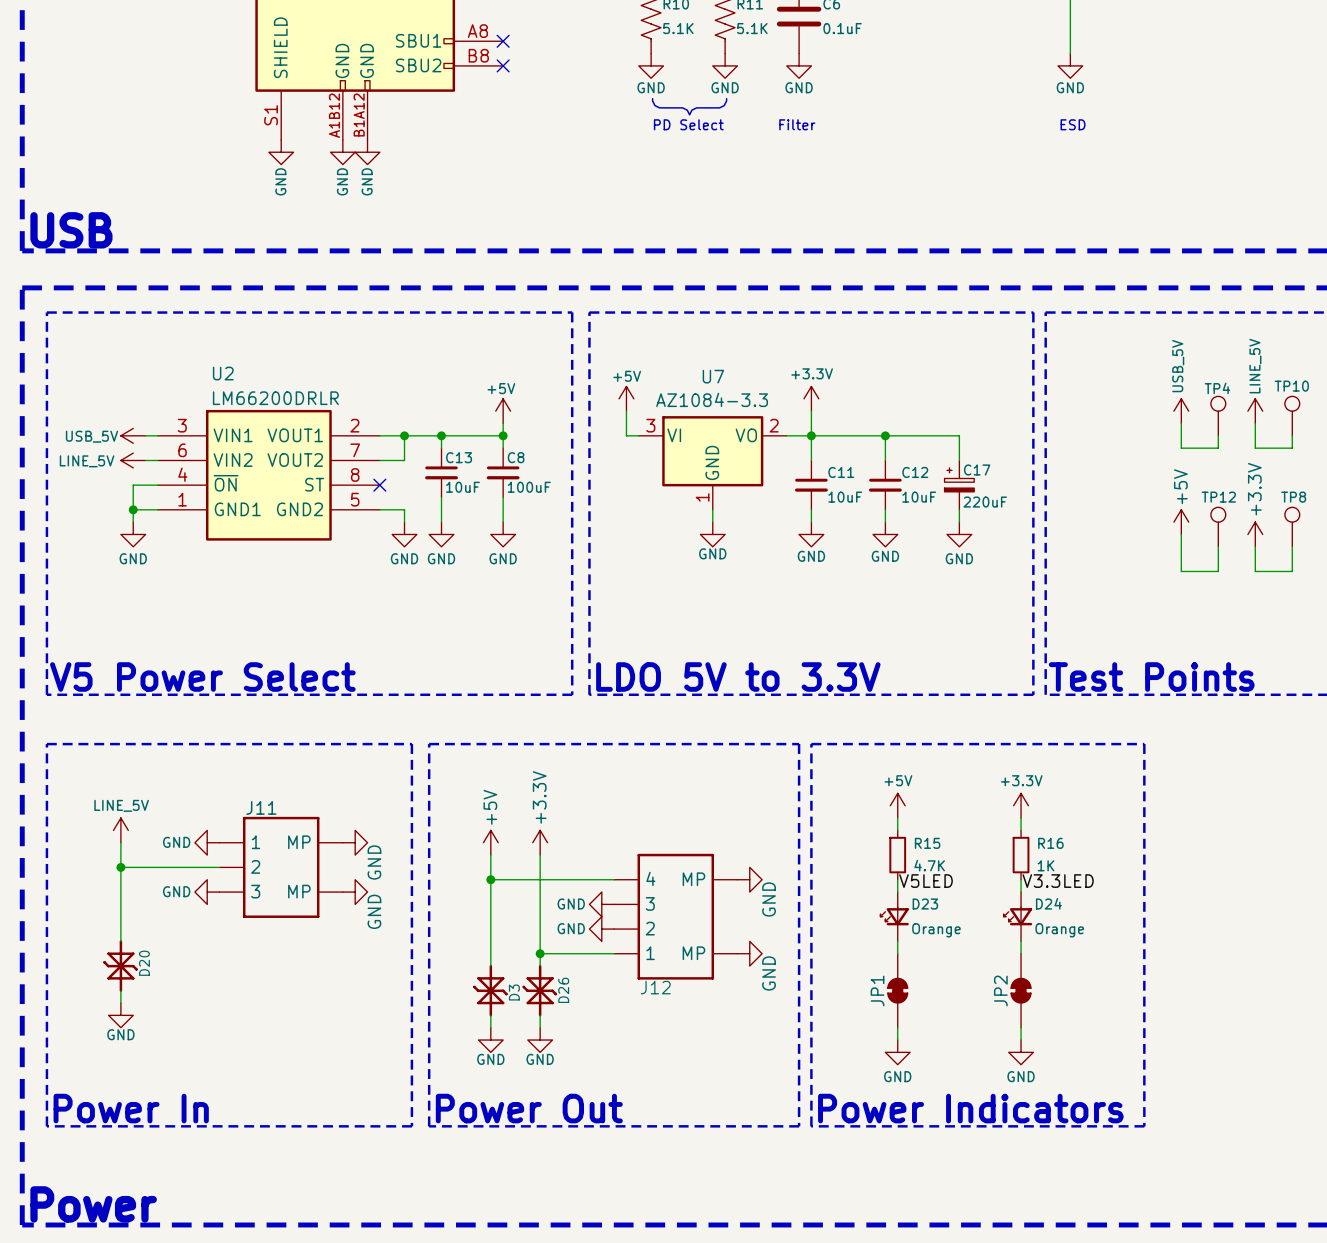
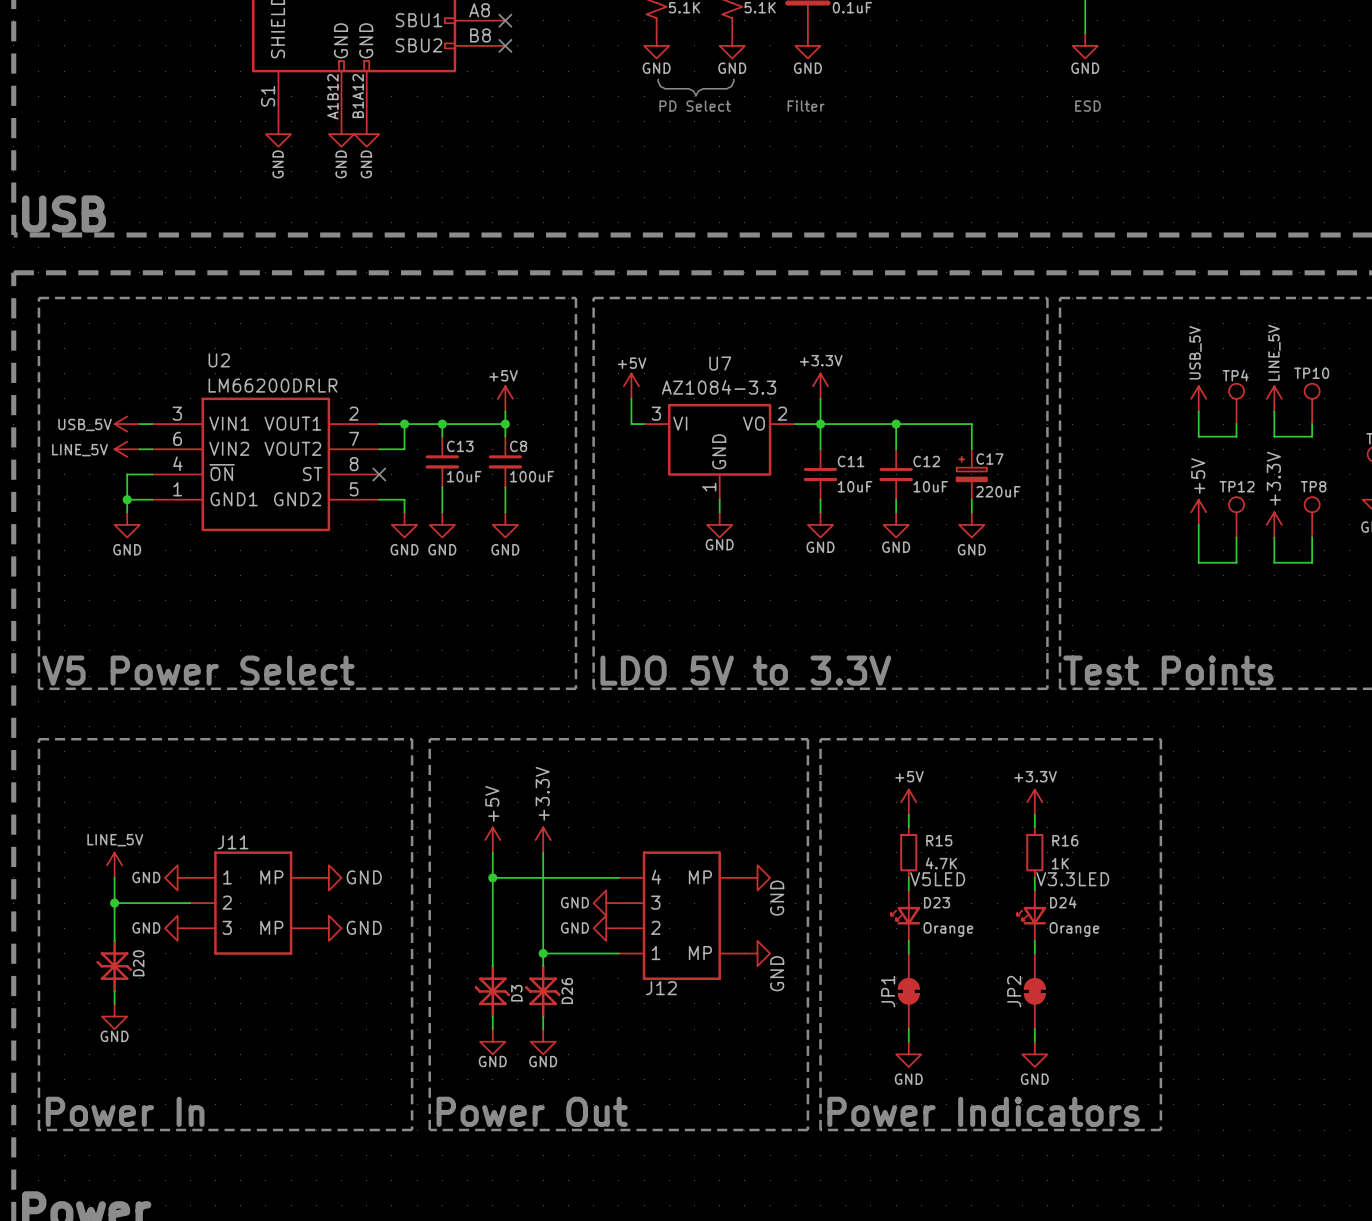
power symbol position: LINE_5V (120, 830) -> LINE_5V (114, 865)
power symbol: GND (207, 842) -> none
power symbol: GND (355, 842) -> none
wire: (120, 867) (219, 867) -> none
junction position: (120, 867) -> (114, 903)
J11 position: (281, 867) -> (253, 903)
power symbol: none -> GND (177, 877)
power symbol: none -> GND (328, 877)
power symbol: GND (207, 892) -> none
power symbol: GND (355, 892) -> none
wire: none -> (114, 903) (190, 903)
power symbol: none -> GND (177, 928)
power symbol: none -> GND (328, 928)

